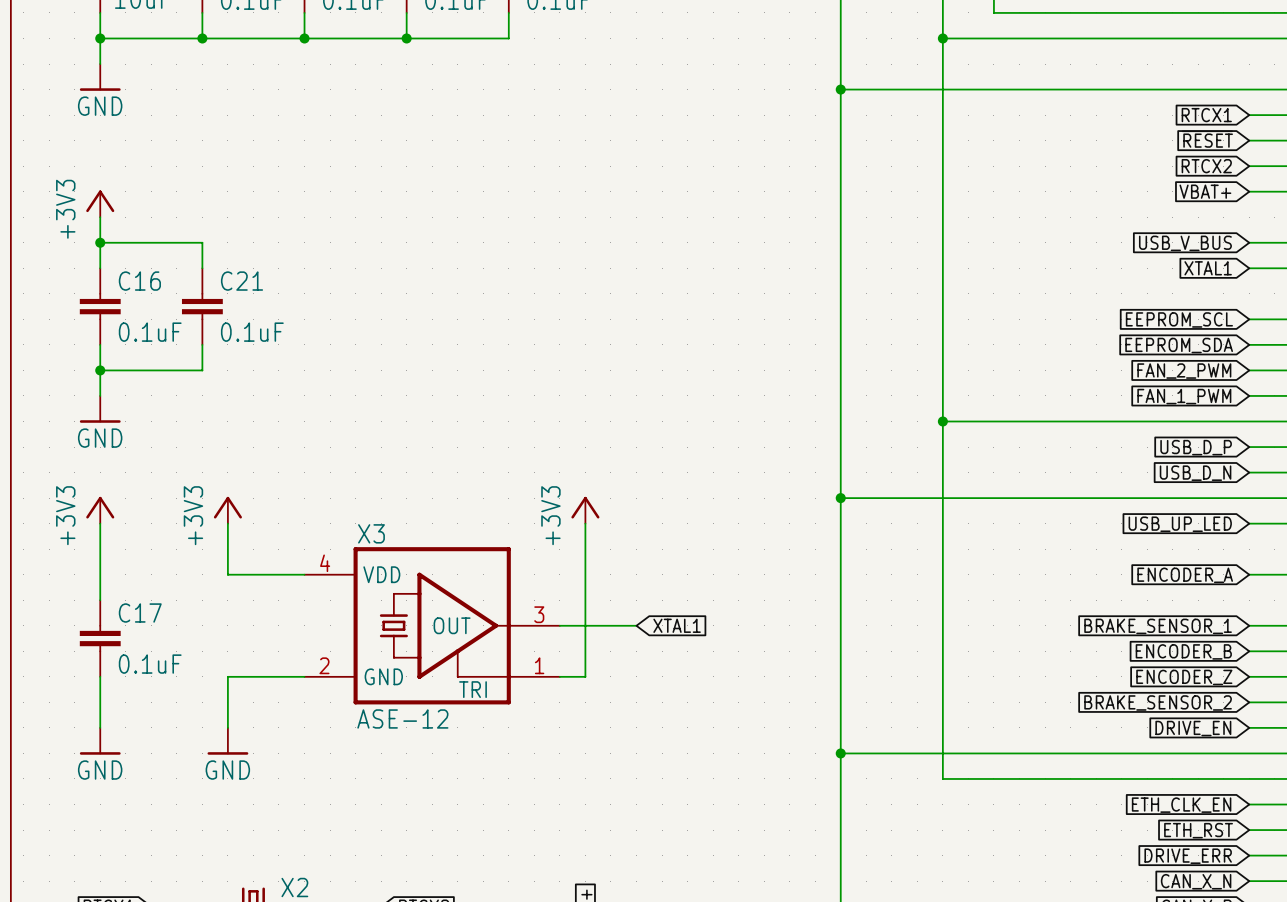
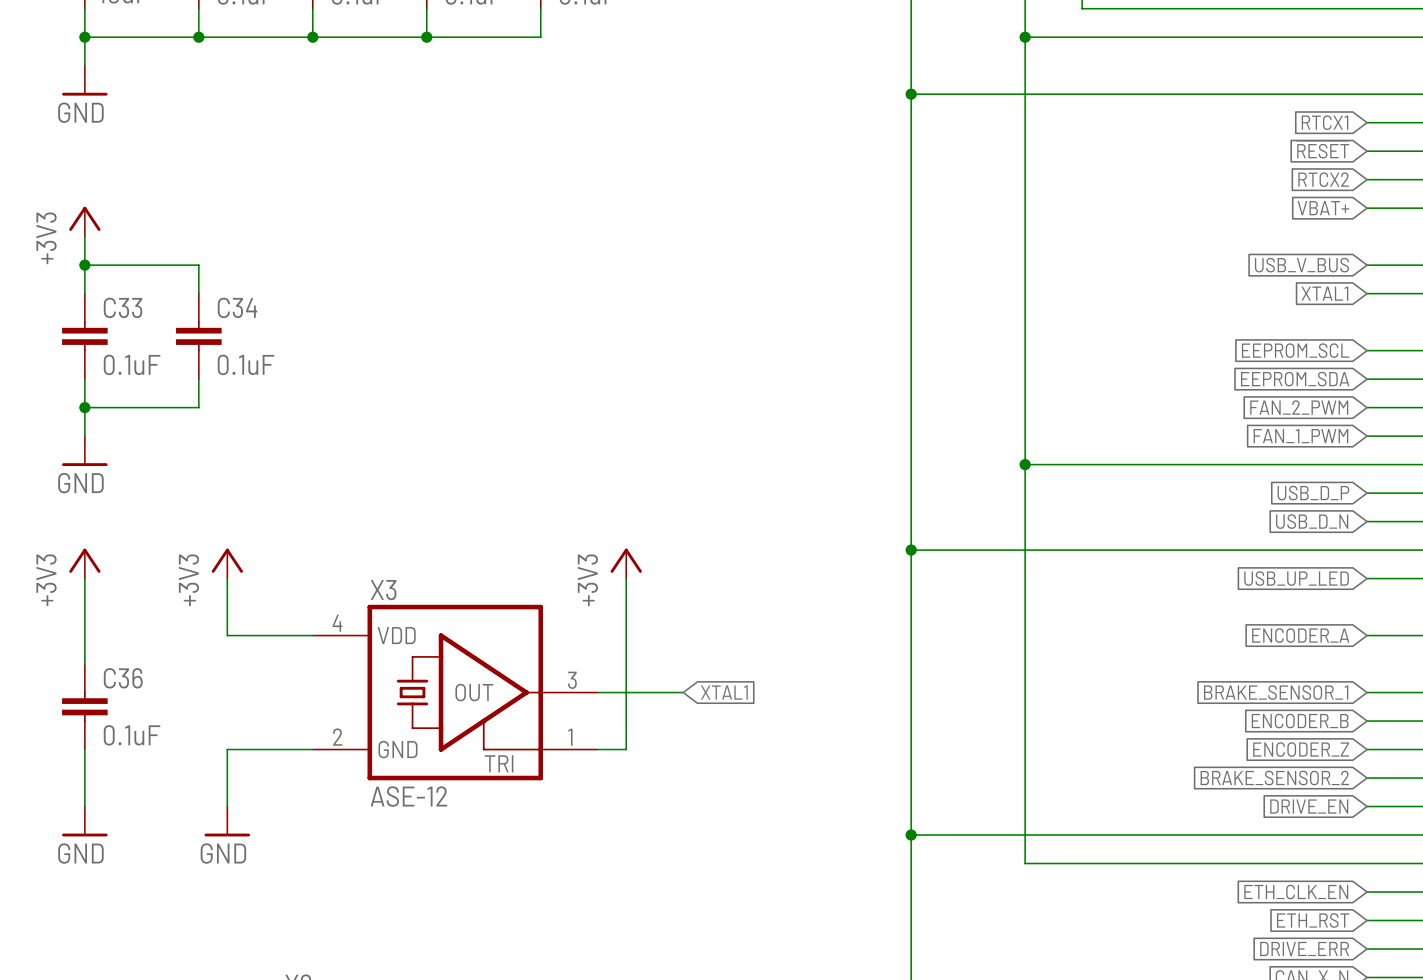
C16 name: C16 (139, 281) -> C33 (123, 307)
C21 name: C21 (242, 281) -> C34 (237, 307)
C17 name: C17 (140, 613) -> C36 (123, 678)

